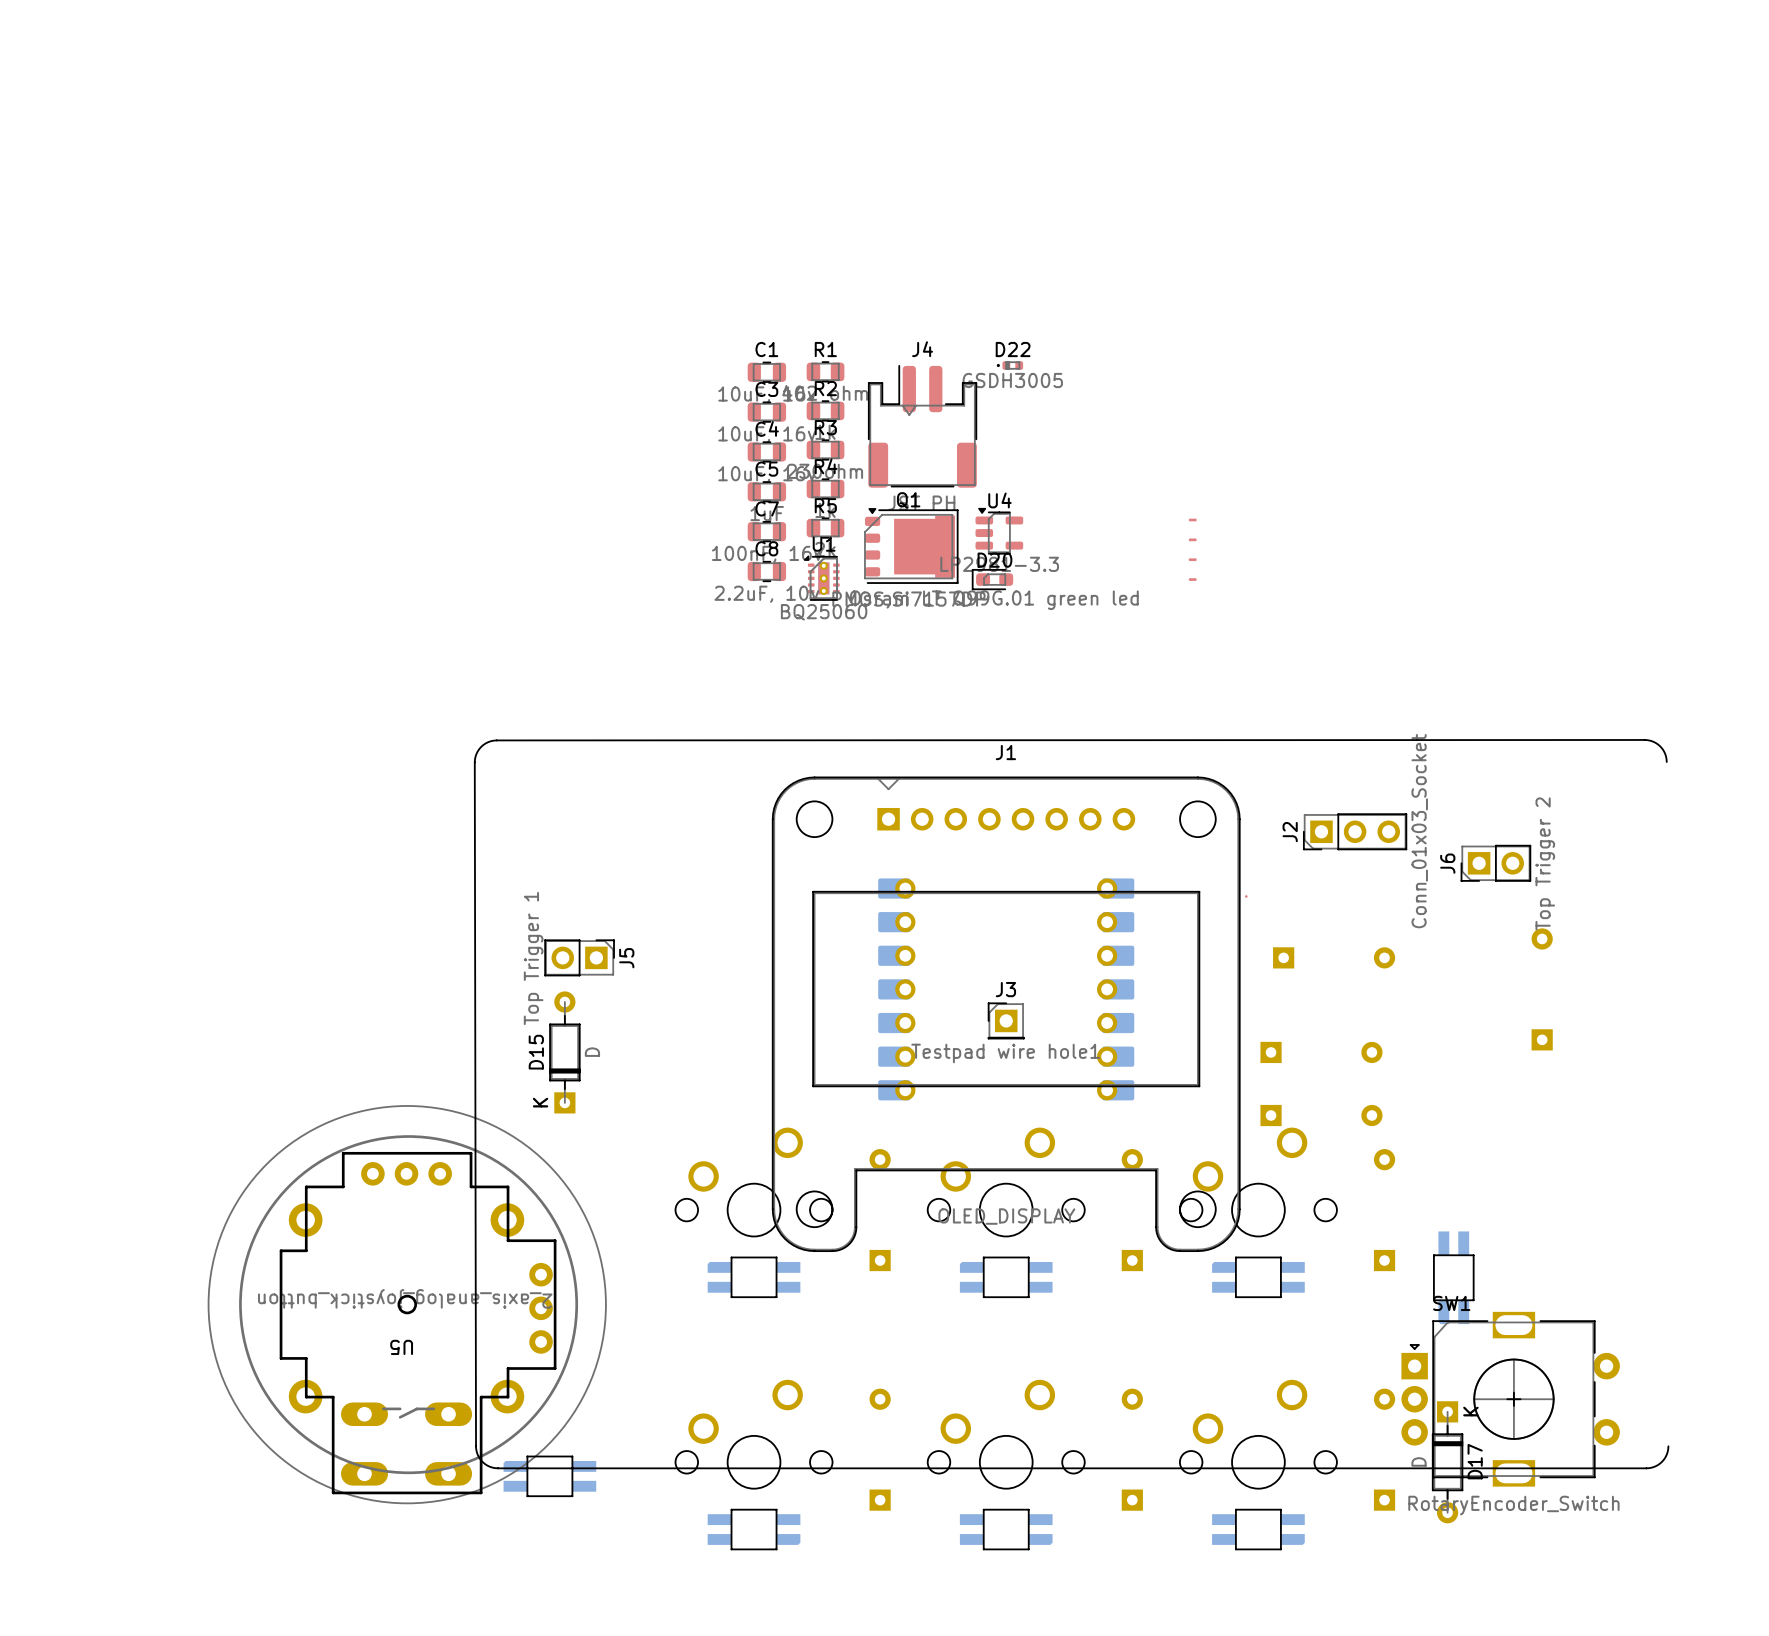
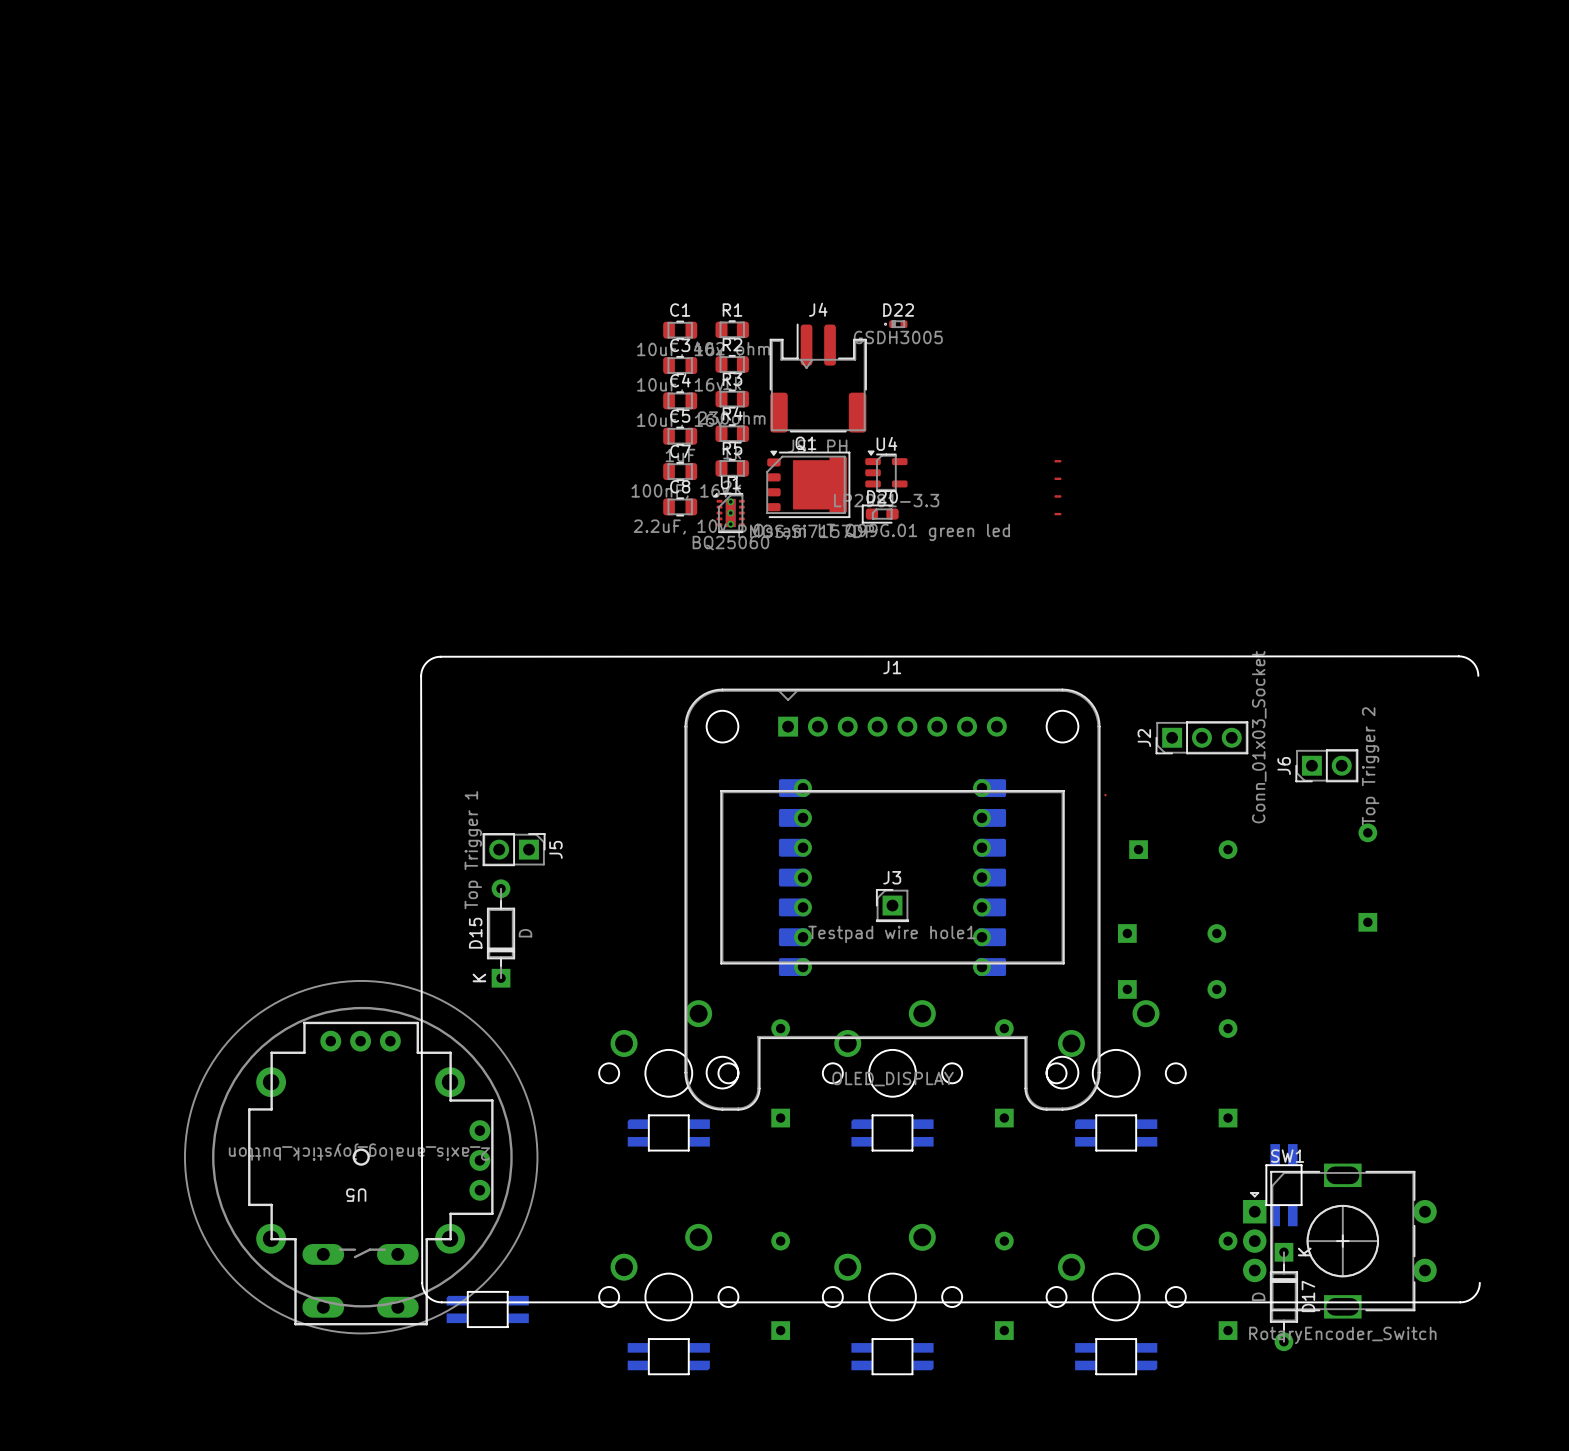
part position: (1453, 1277) -> (1283, 1185)

